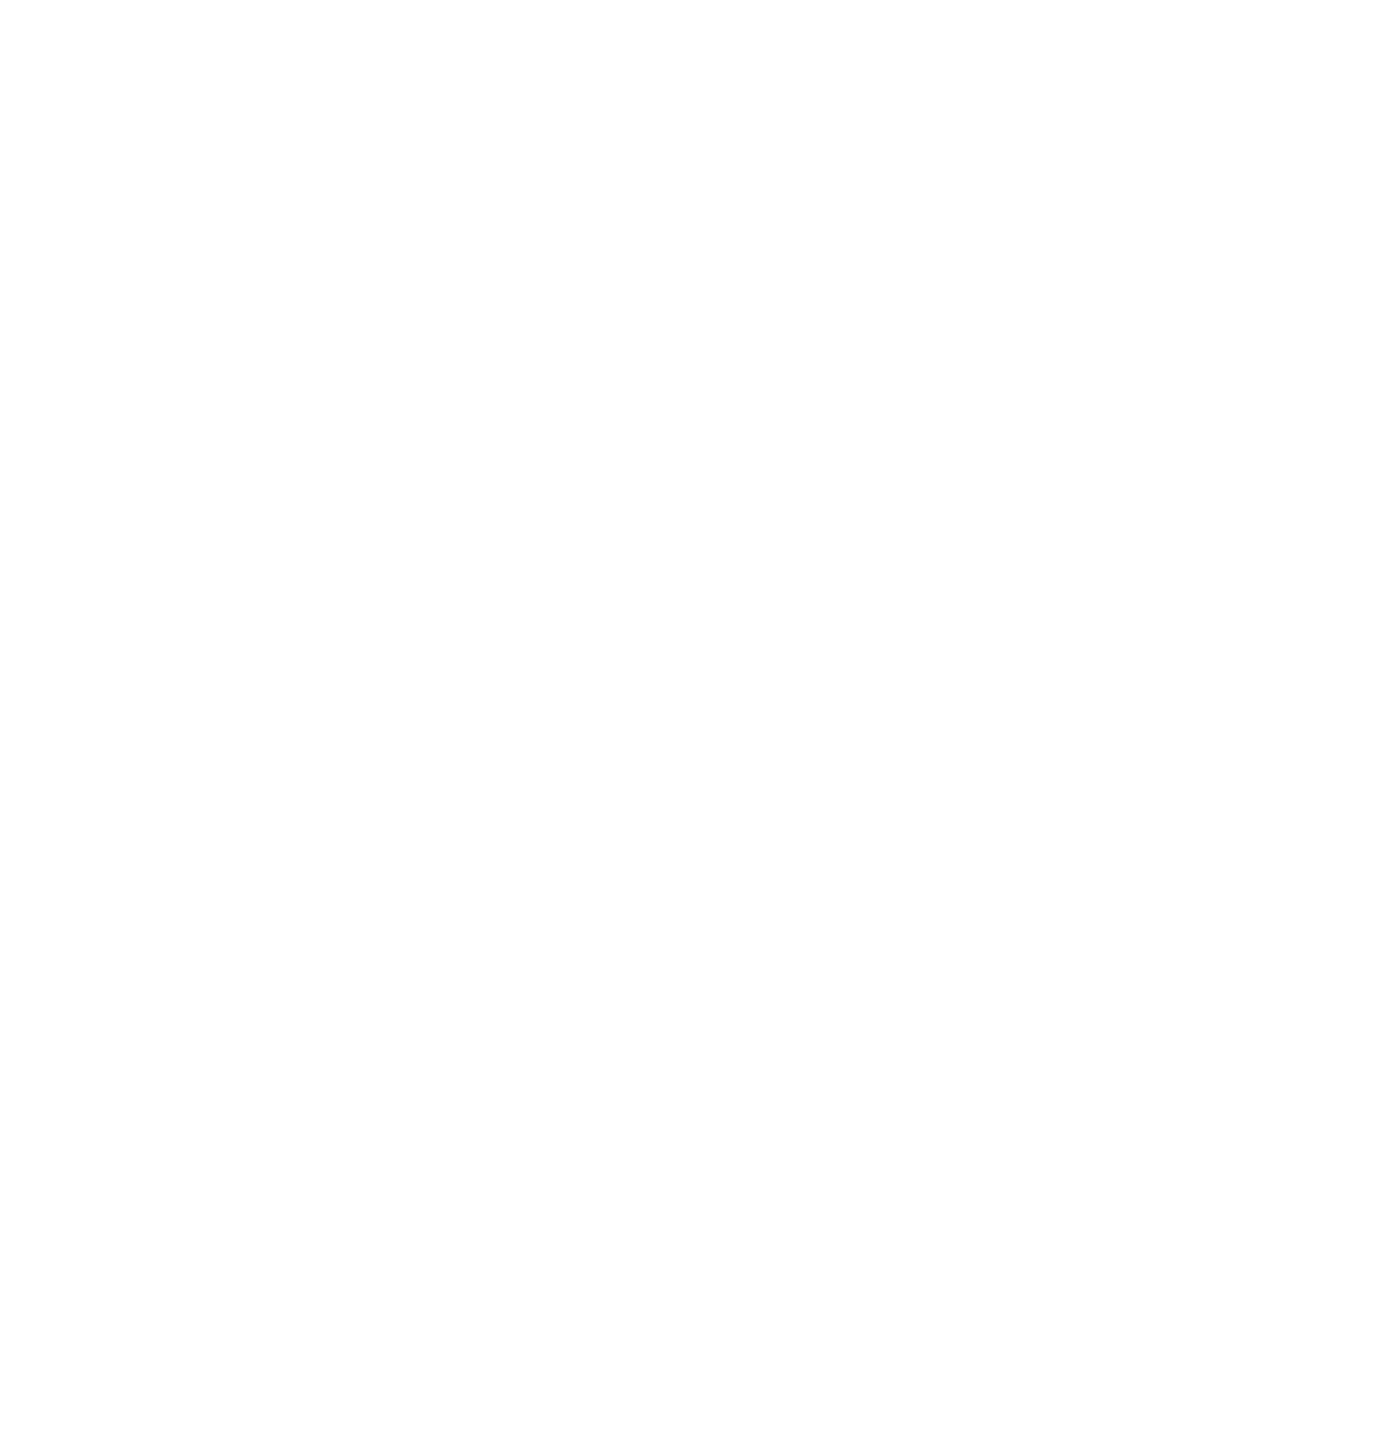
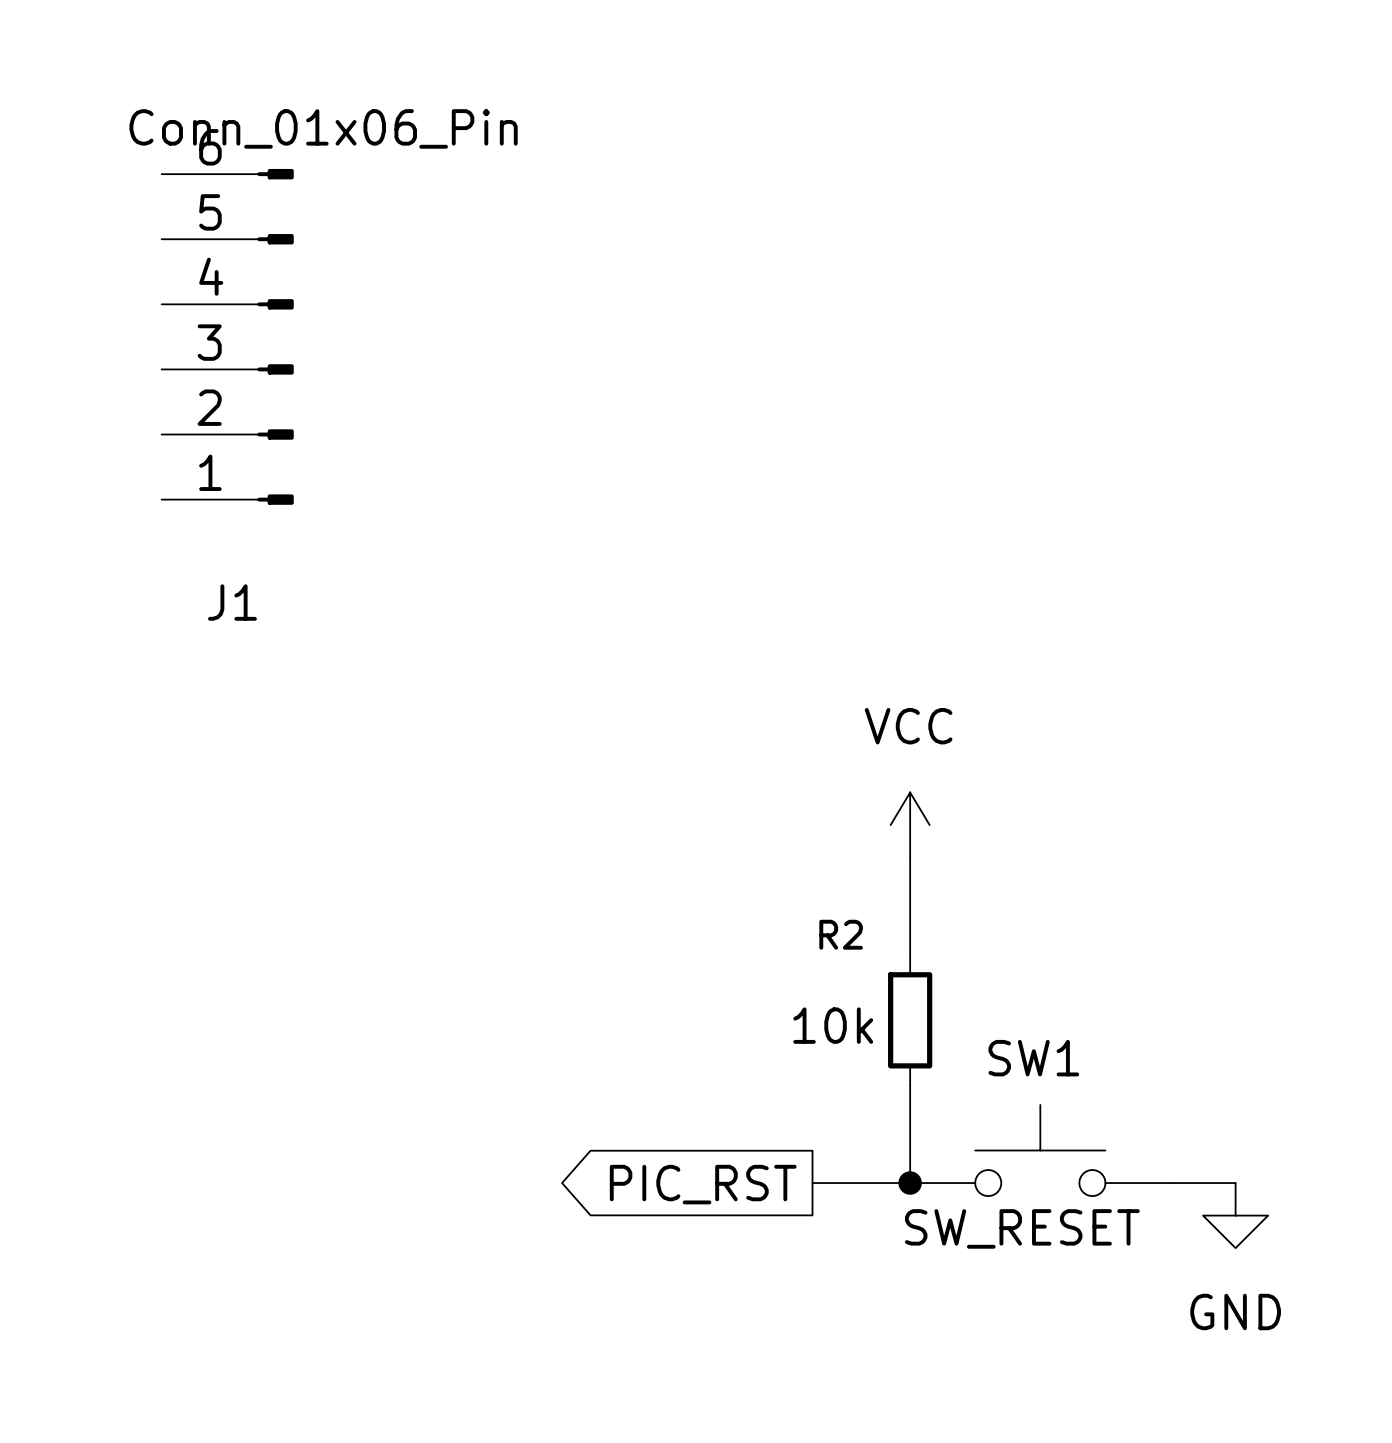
J1: none -> Conn_01x06_Pin (227, 336)
power symbol: none -> VCC (910, 825)
wire: none -> (910, 857) (910, 955)
R2: none -> 10k (910, 1020)
wire: none -> (910, 1085) (910, 1183) (812, 1183)
SW1: none -> SW_RESET (1040, 1150)
junction: none -> (910, 1183)
wire: none -> (1170, 1183) (1235, 1183)
global label: none -> PIC_RST (703, 1184)
power symbol: none -> GND (1235, 1215)

